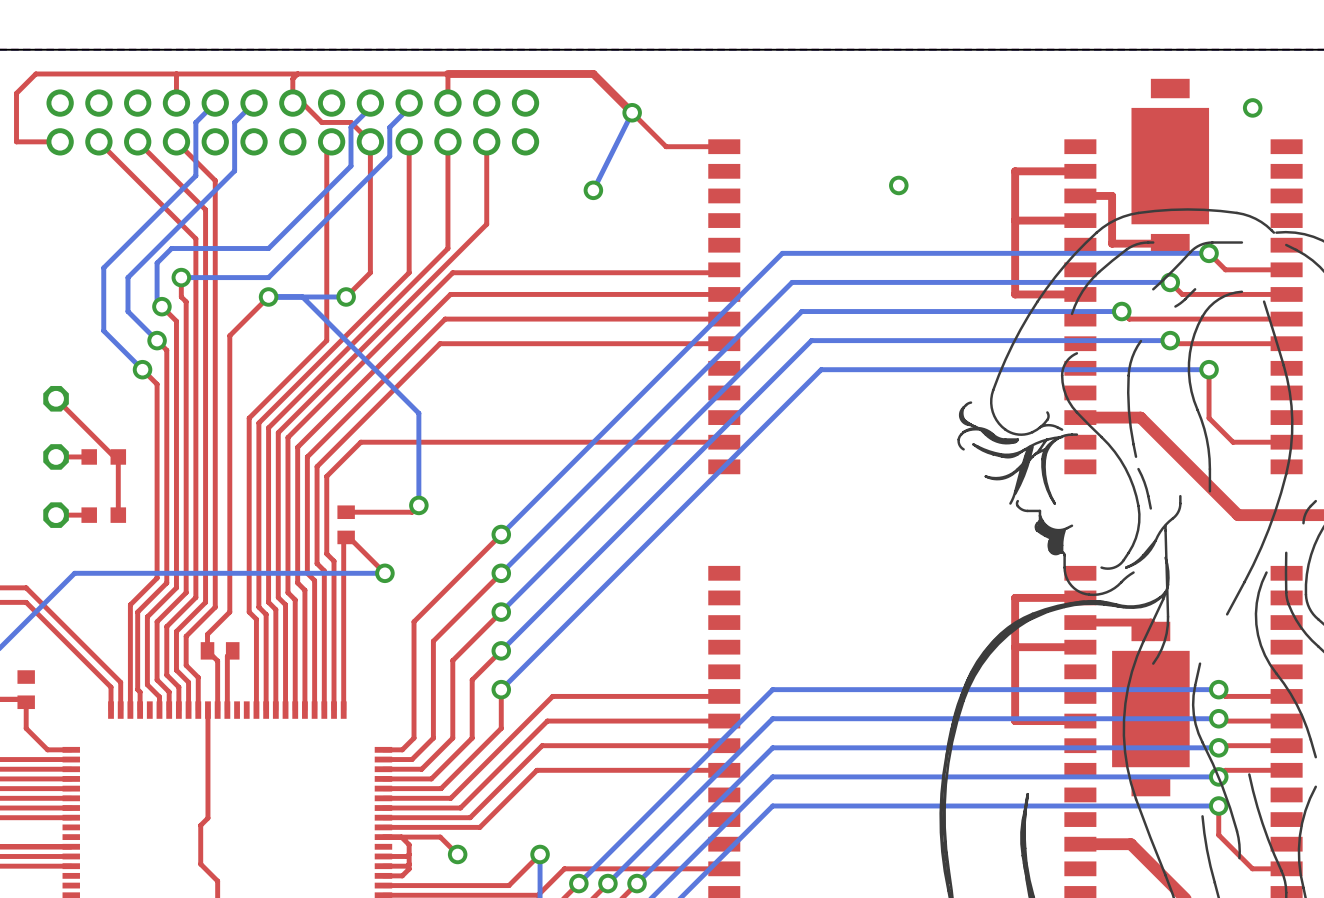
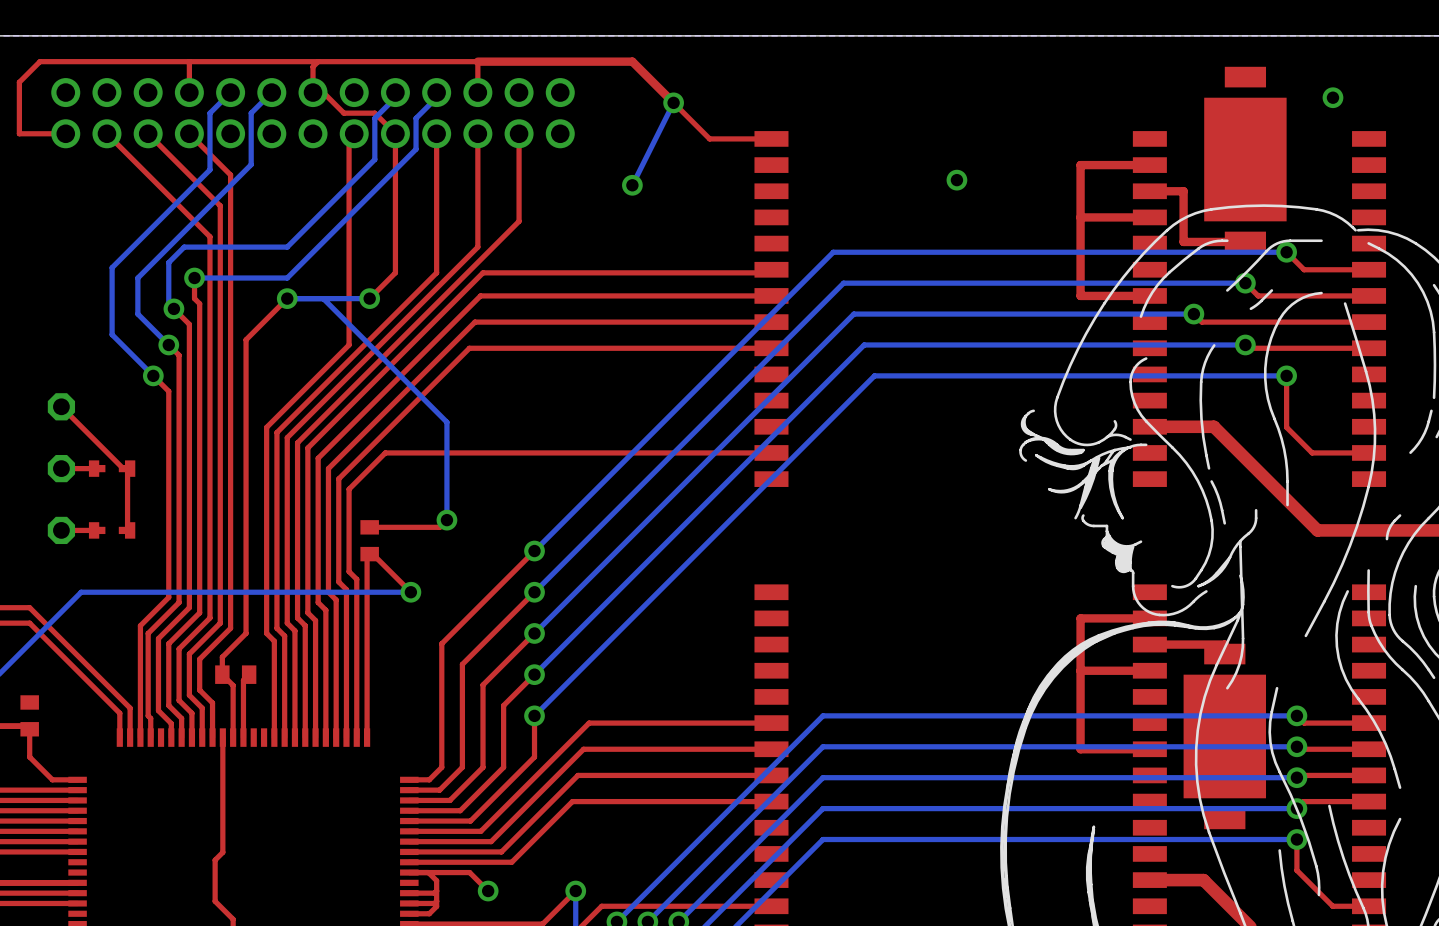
part footprint: [81, 449, 127, 465] -> [88, 460, 136, 477]
part footprint: [81, 507, 127, 523] -> [88, 522, 136, 539]

